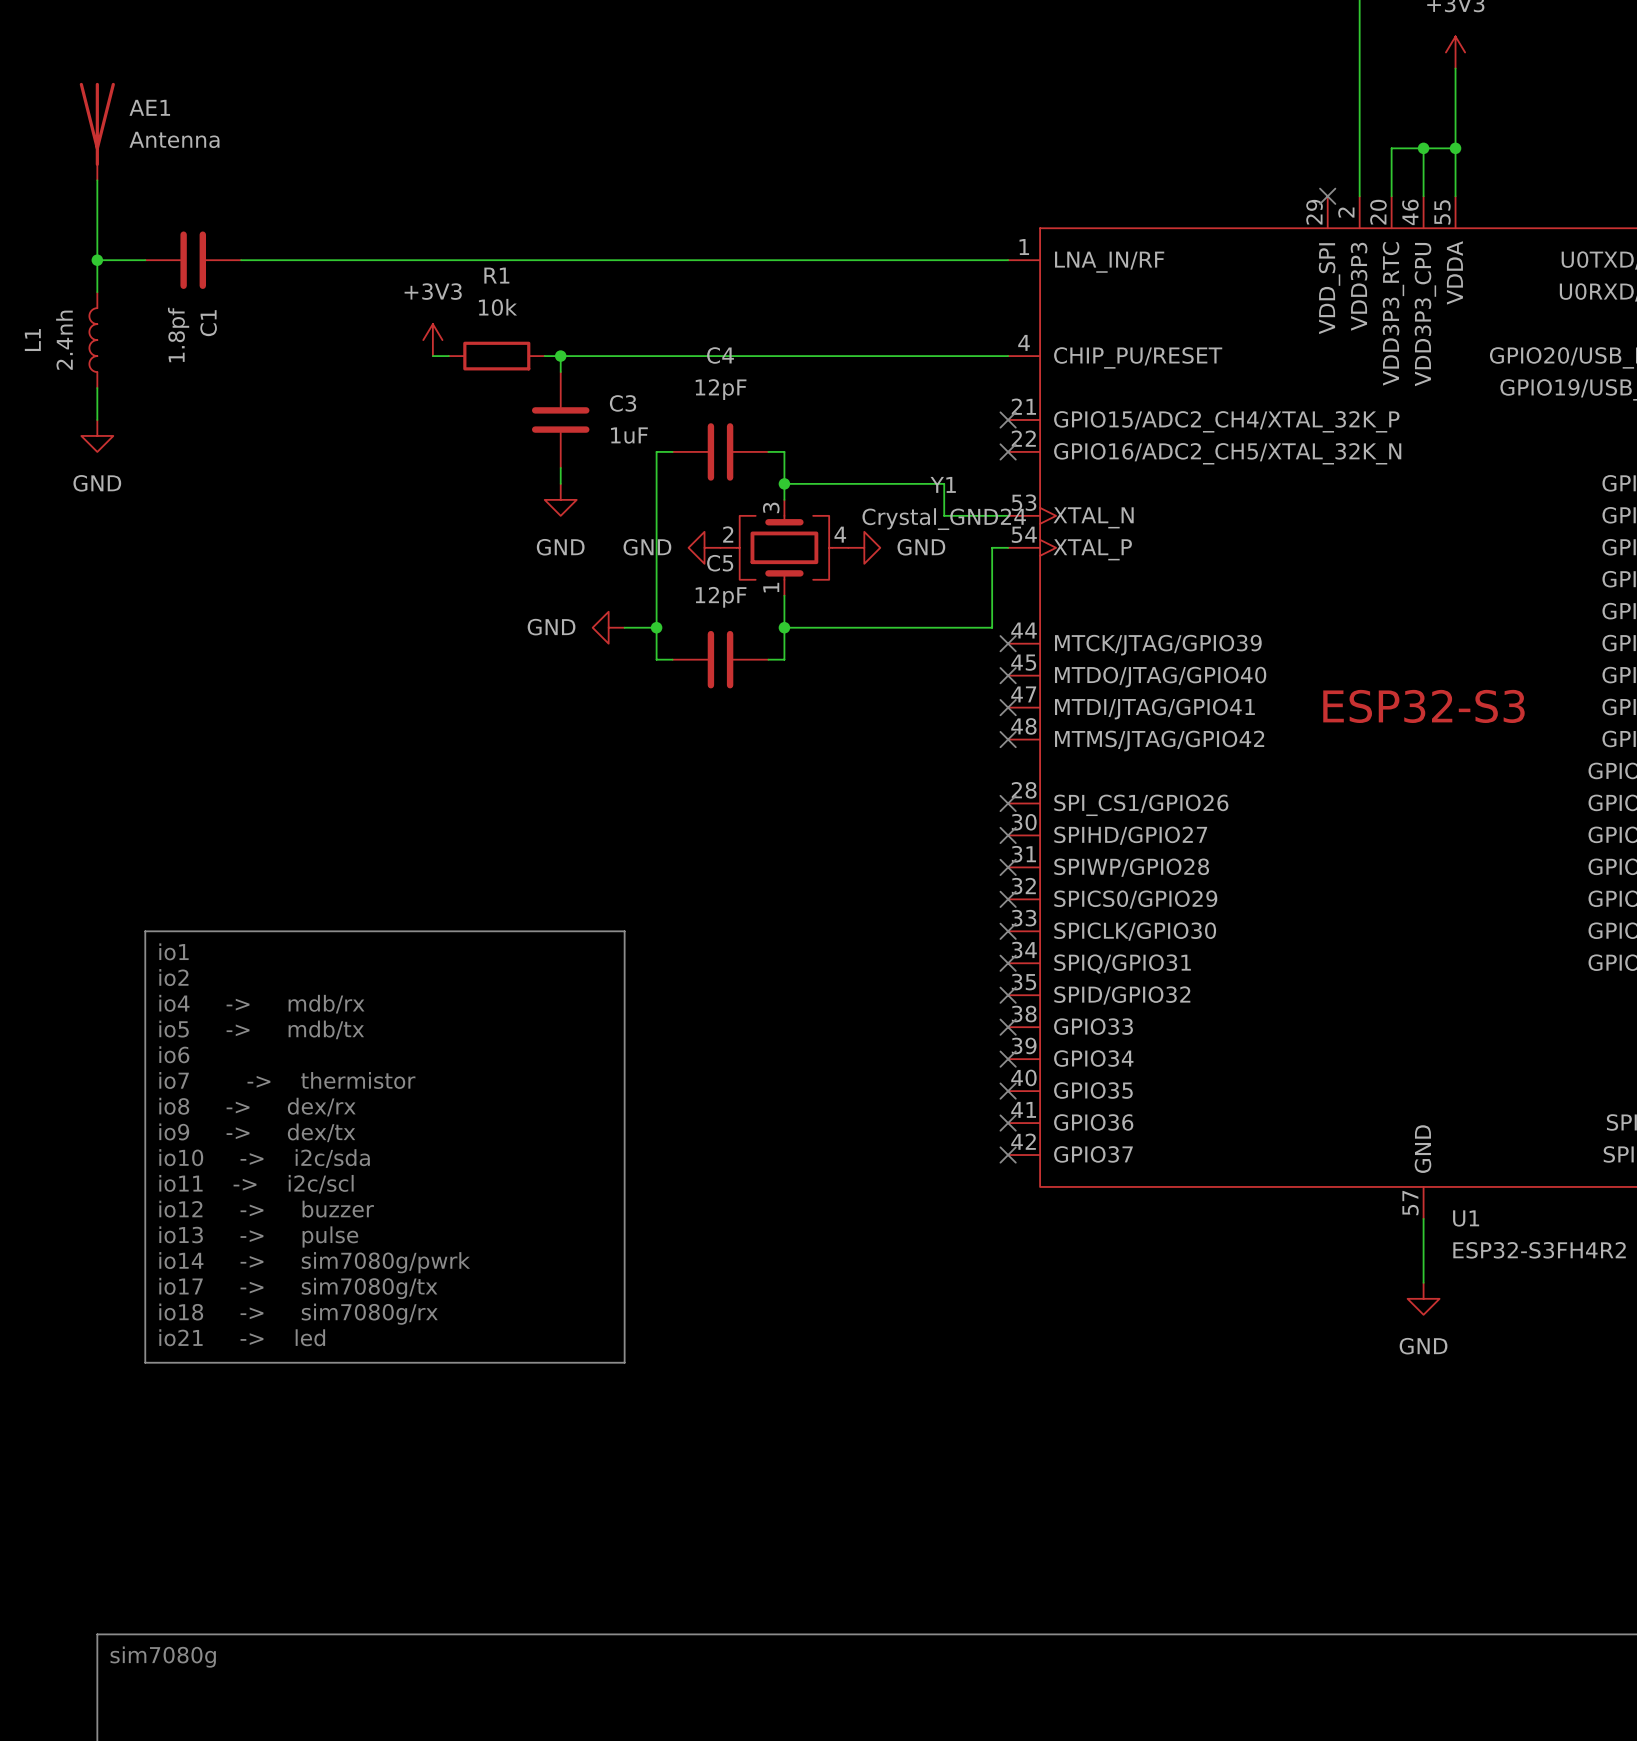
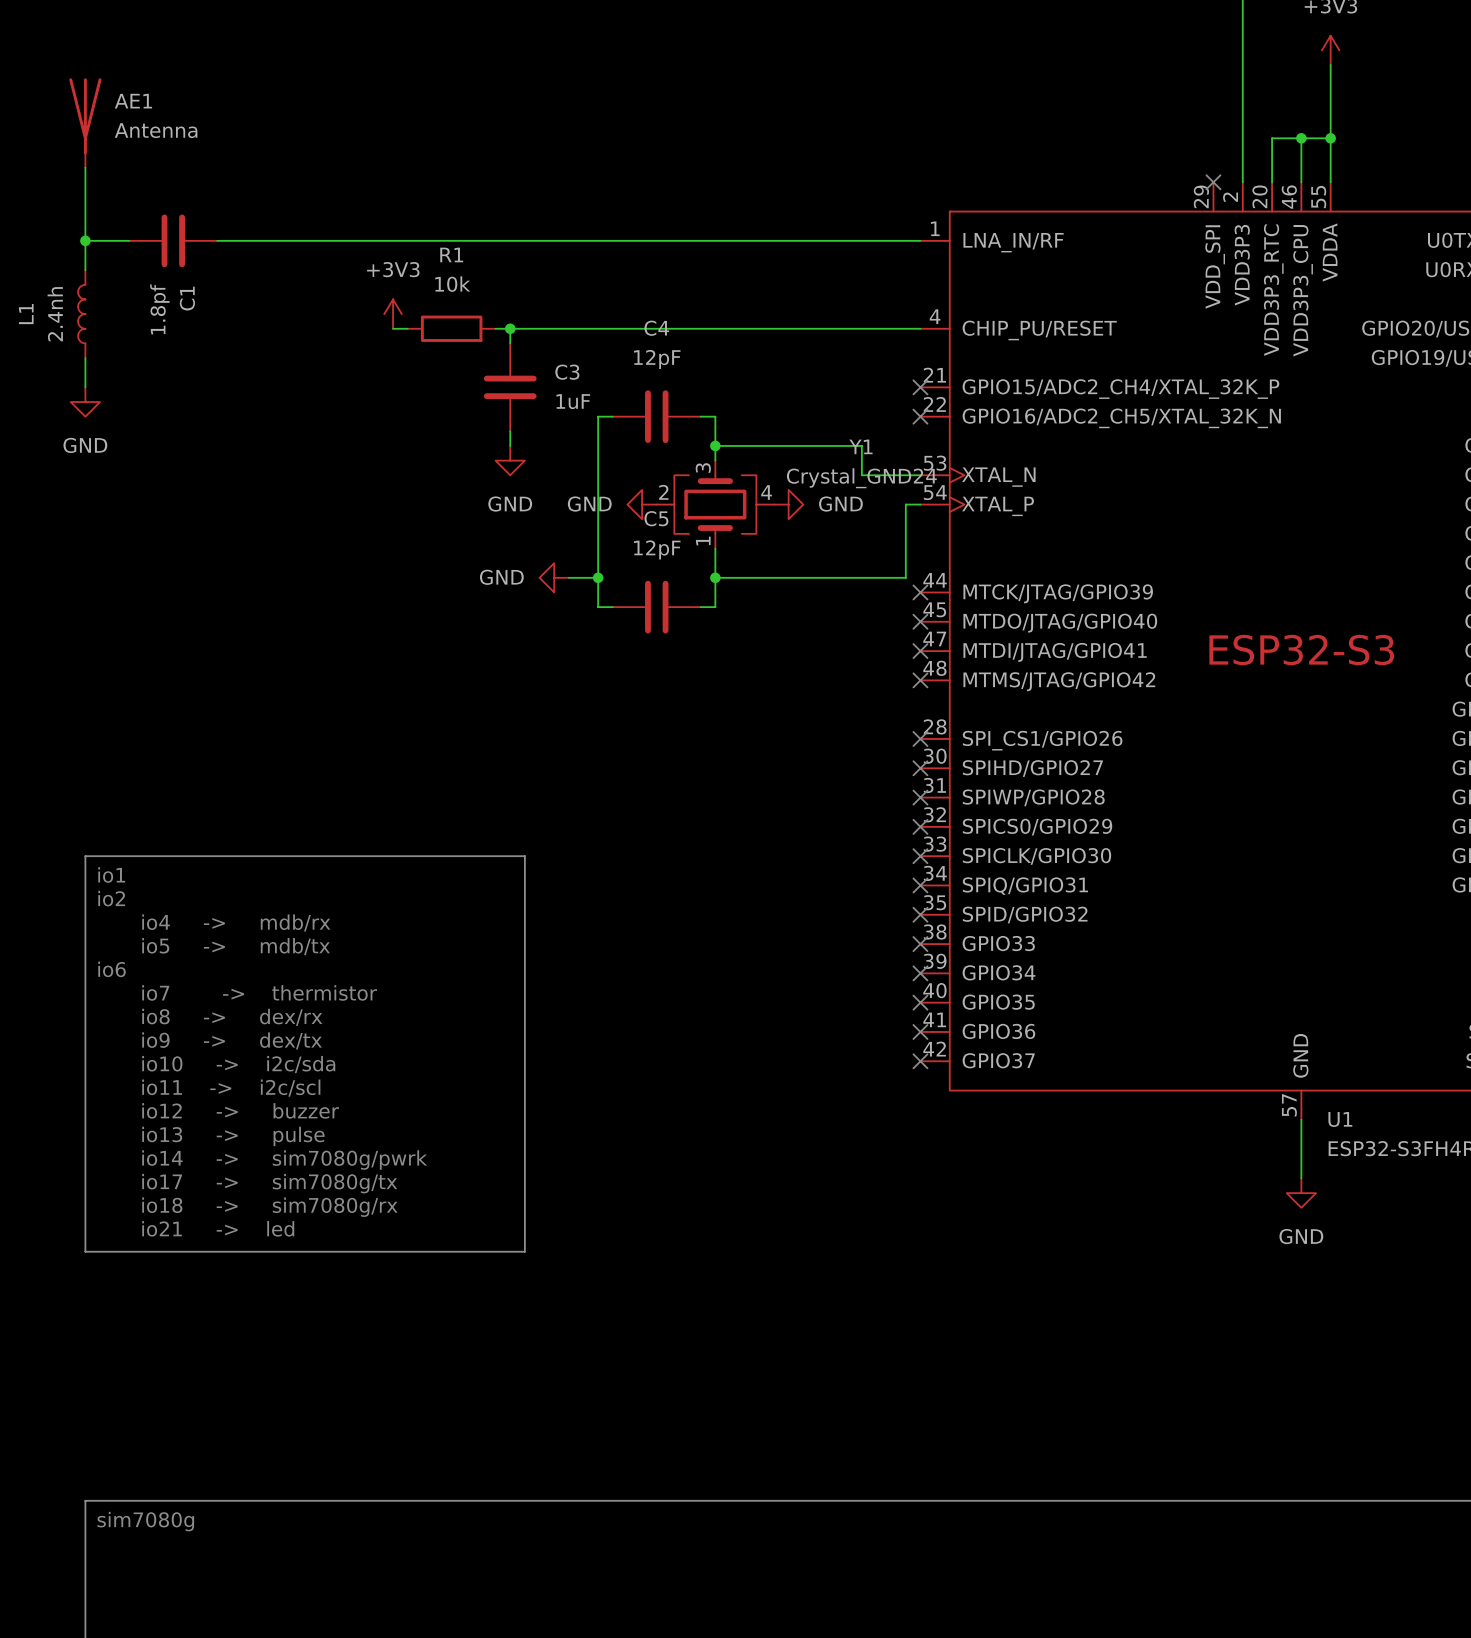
line: (145, 931) (145, 1362) -> (129, 856) (85, 856) (85, 1251) (129, 1251)
line: (576, 931) (624, 931) (624, 1362) (576, 1362) -> (524, 856) (524, 1251)
text position: io1 (174, 951) -> io1 (111, 875)
text position: io2 (173, 977) -> io2 (111, 898)
text position: io6 (174, 1054) -> io6 (112, 969)

